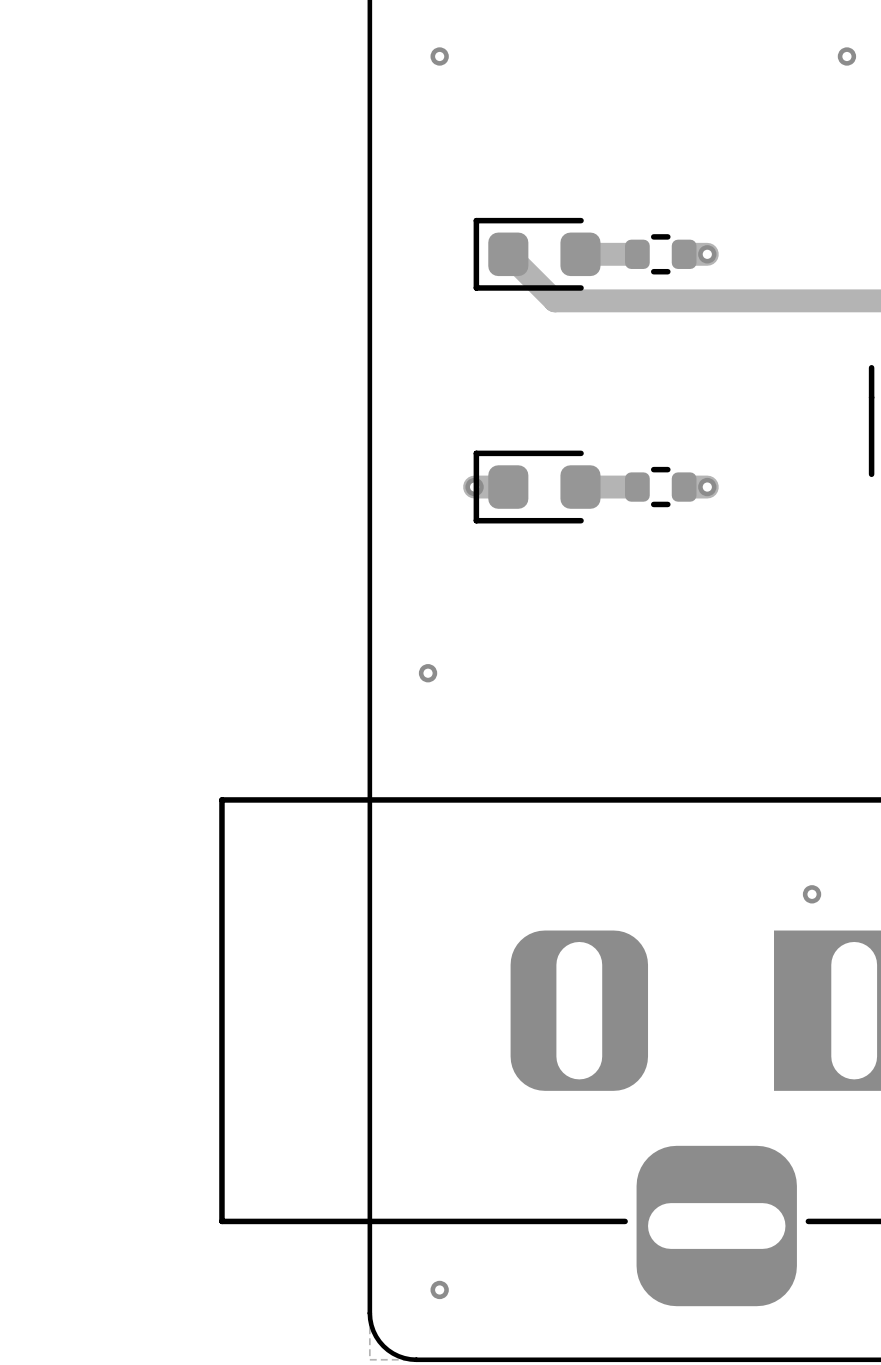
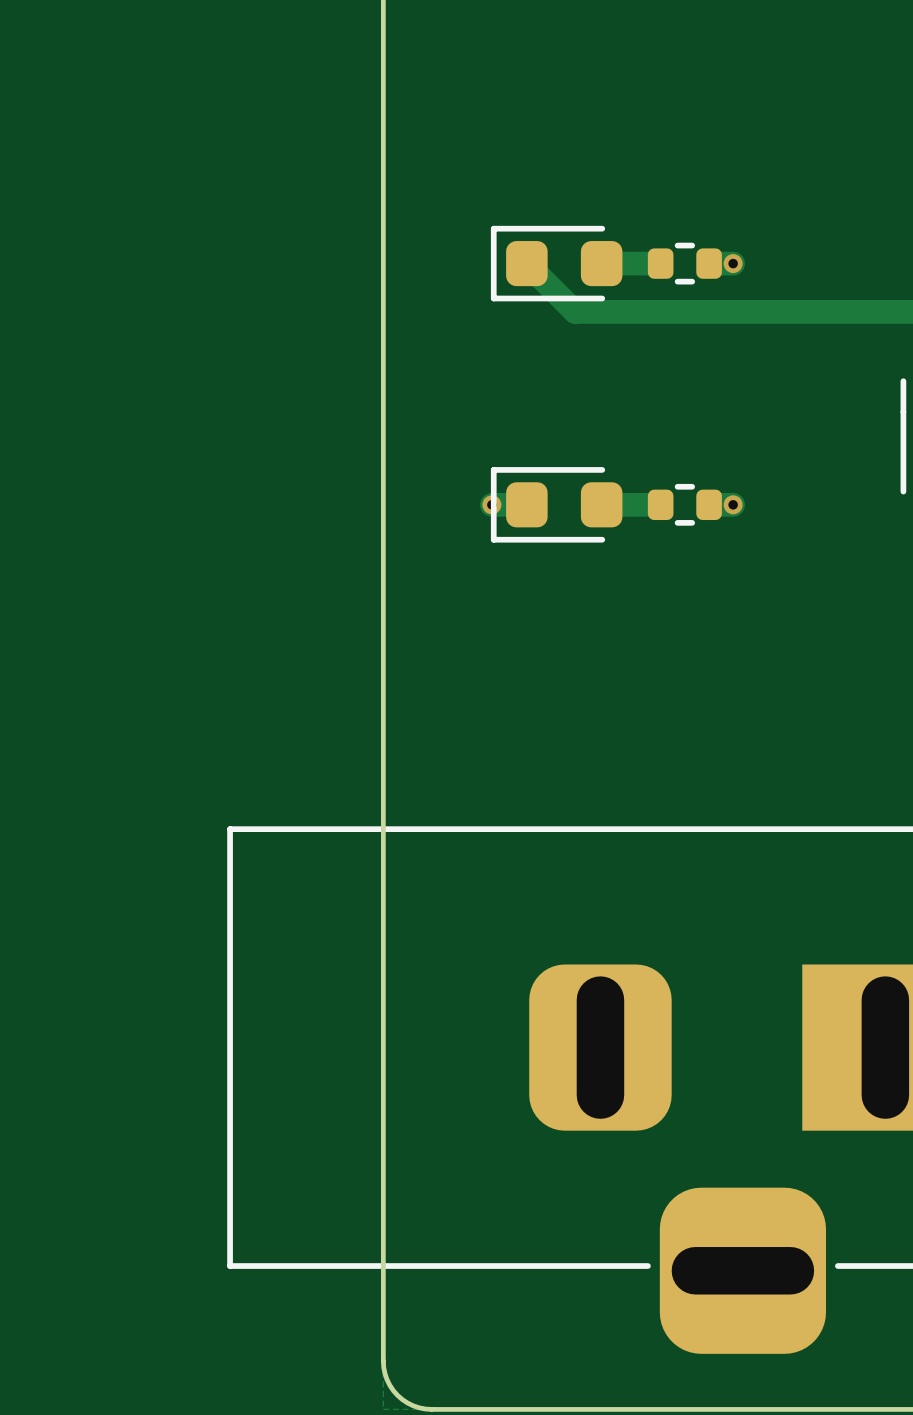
via: (439, 56) -> none
via: (846, 56) -> none
via: (428, 673) -> none
via: (812, 894) -> none
via: (439, 1289) -> none

